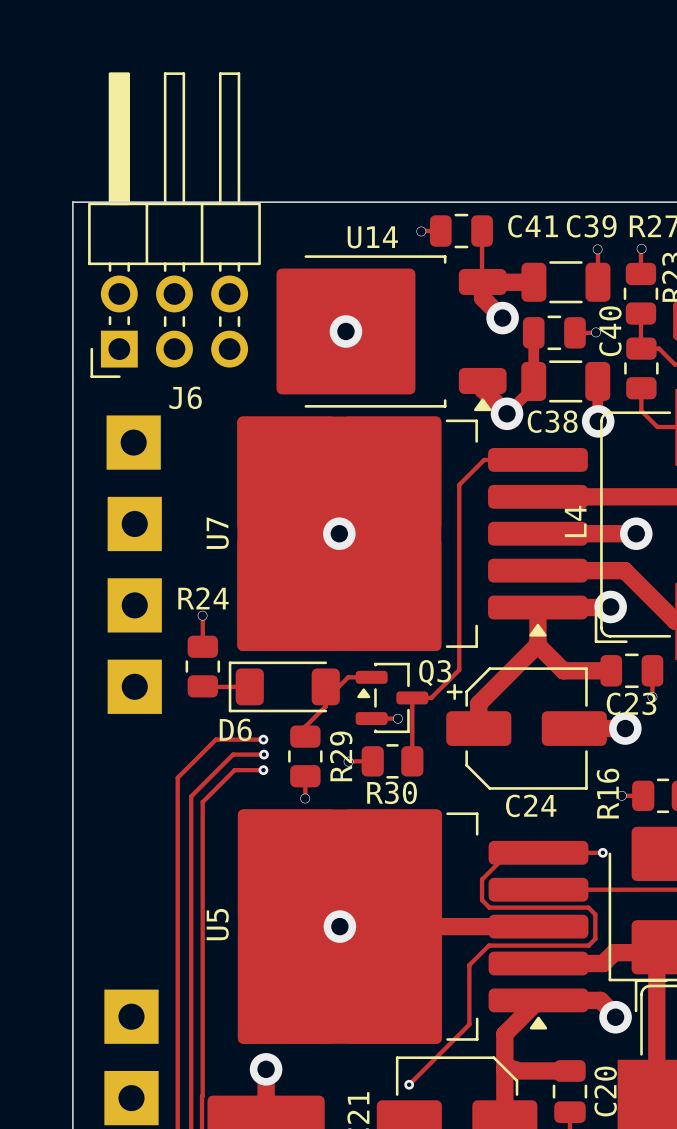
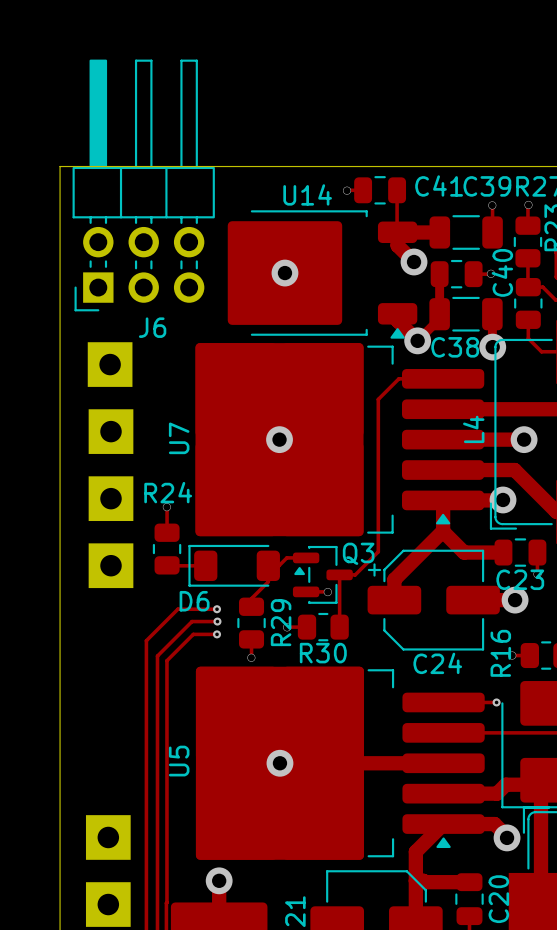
track: (538, 852) (508, 852) (482, 879) (482, 900) (489, 907) (588, 907) (595, 914) (595, 938) (588, 945) (488, 945) (469, 965) (469, 1024) (409, 1084) -> none
via: (409, 1084) -> none

